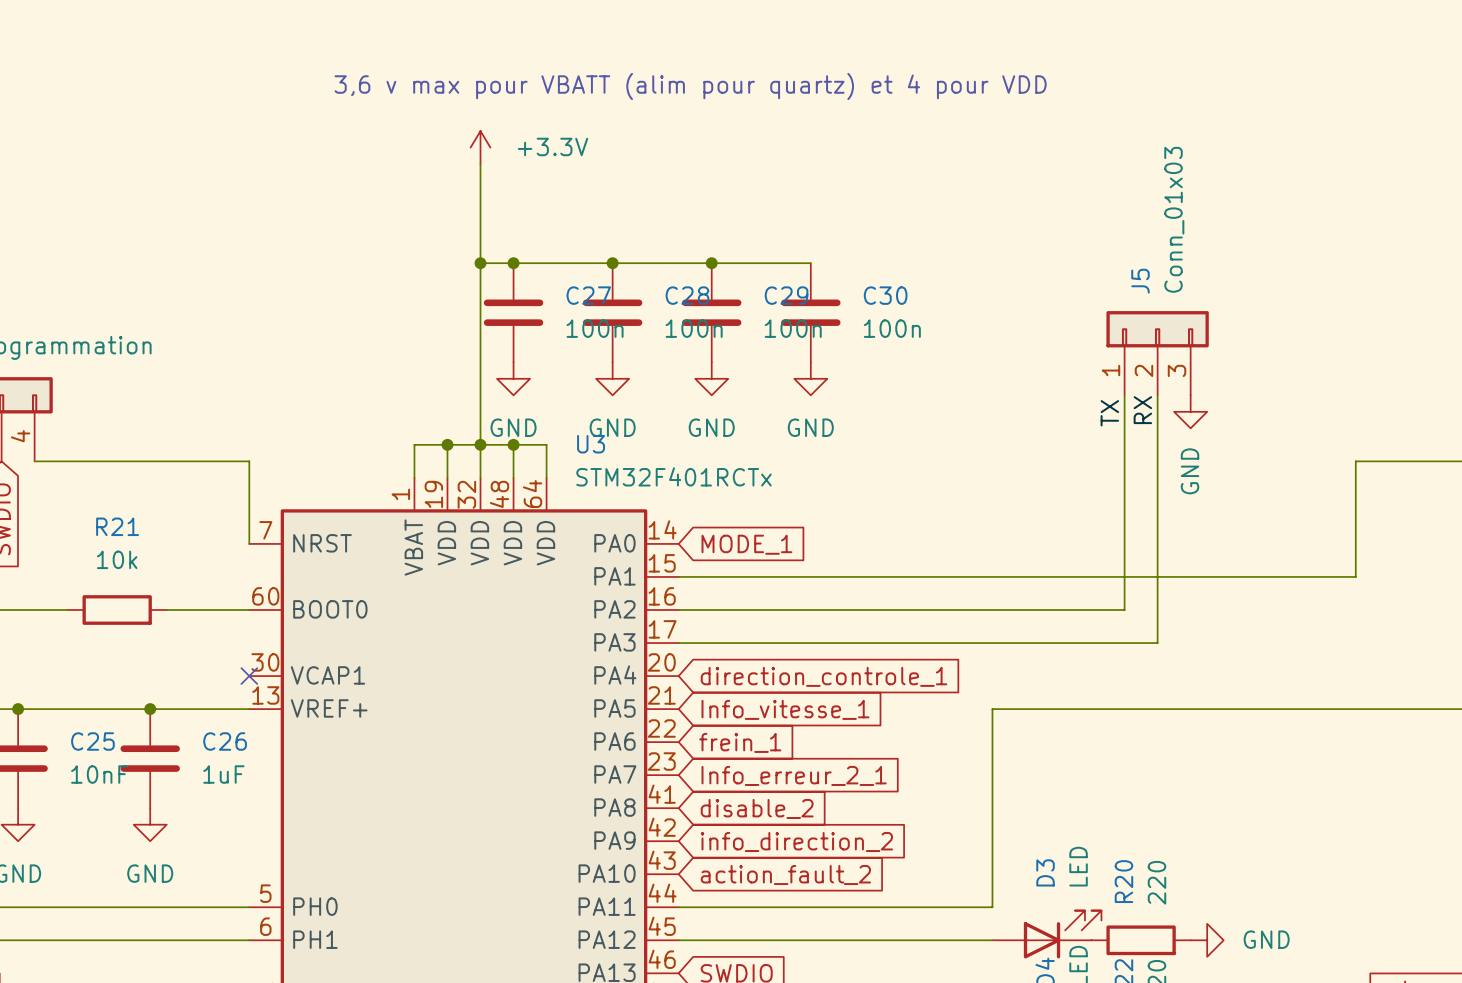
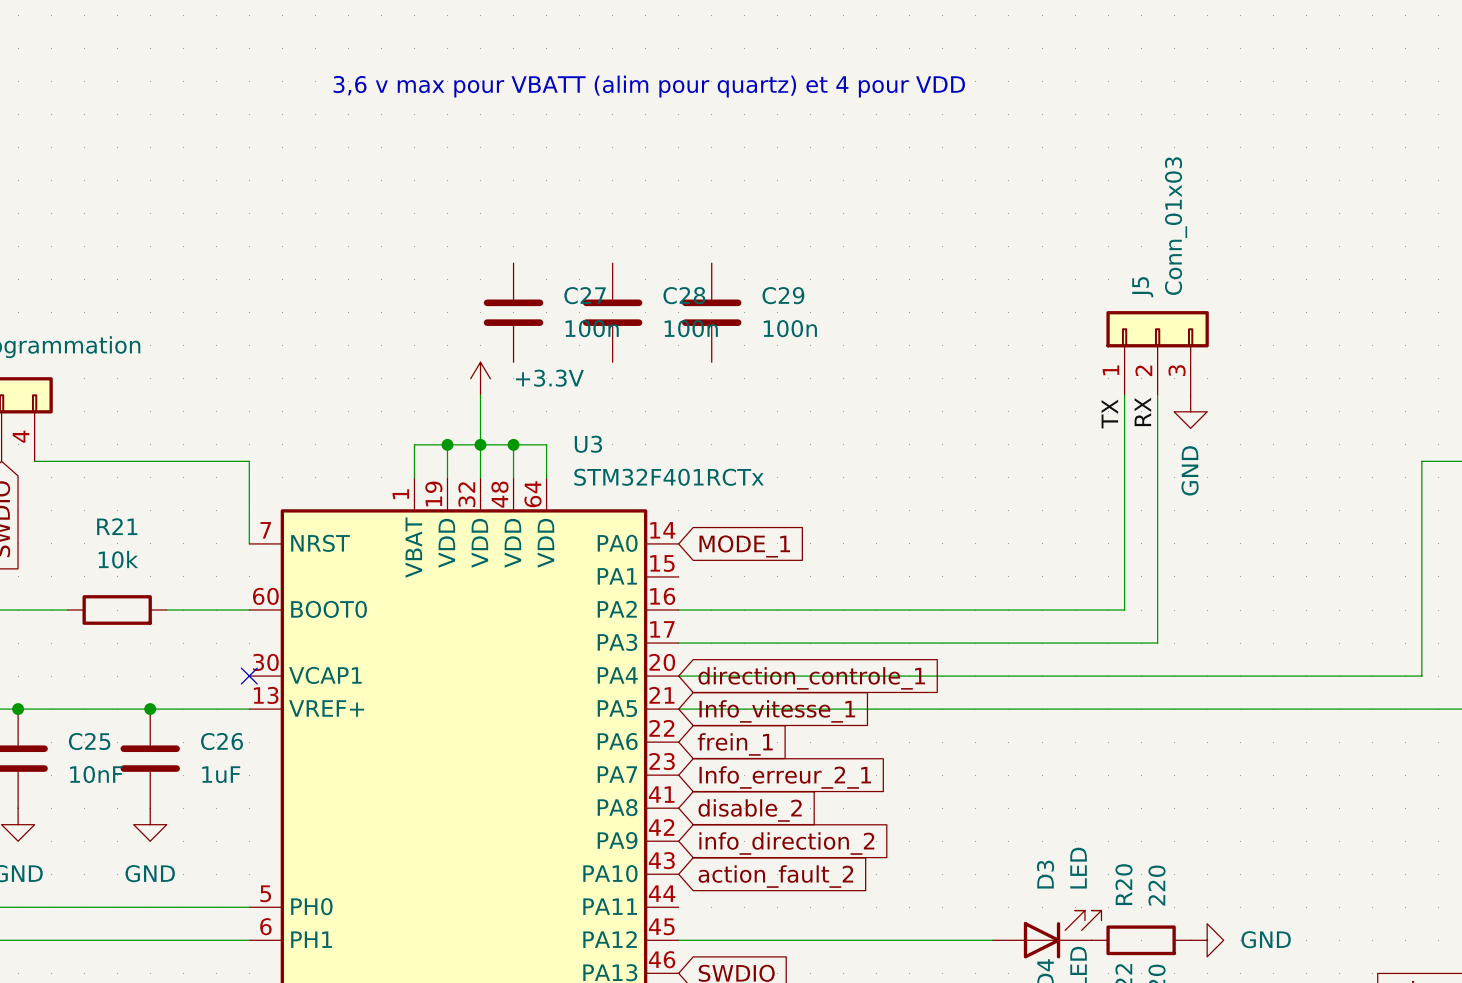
power symbol position: +3.3V (480, 147) -> +3.3V (480, 378)
wire: (480, 164) (480, 395) -> none
wire: (480, 263) (810, 263) -> none
junction: (480, 263) -> none
junction: (513, 263) -> none
junction: (612, 263) -> none
junction: (711, 263) -> none
C30: 100n (810, 312) -> none
power symbol: GND (513, 378) -> none
power symbol: GND (612, 378) -> none
power symbol: GND (711, 378) -> none
power symbol: GND (810, 378) -> none
wire: (1421, 461) (1355, 461) (1355, 576) (678, 576) -> (1421, 461) (1421, 676) (678, 676)
wire: (992, 709) (992, 907) (678, 907) -> (992, 709) (678, 709)

